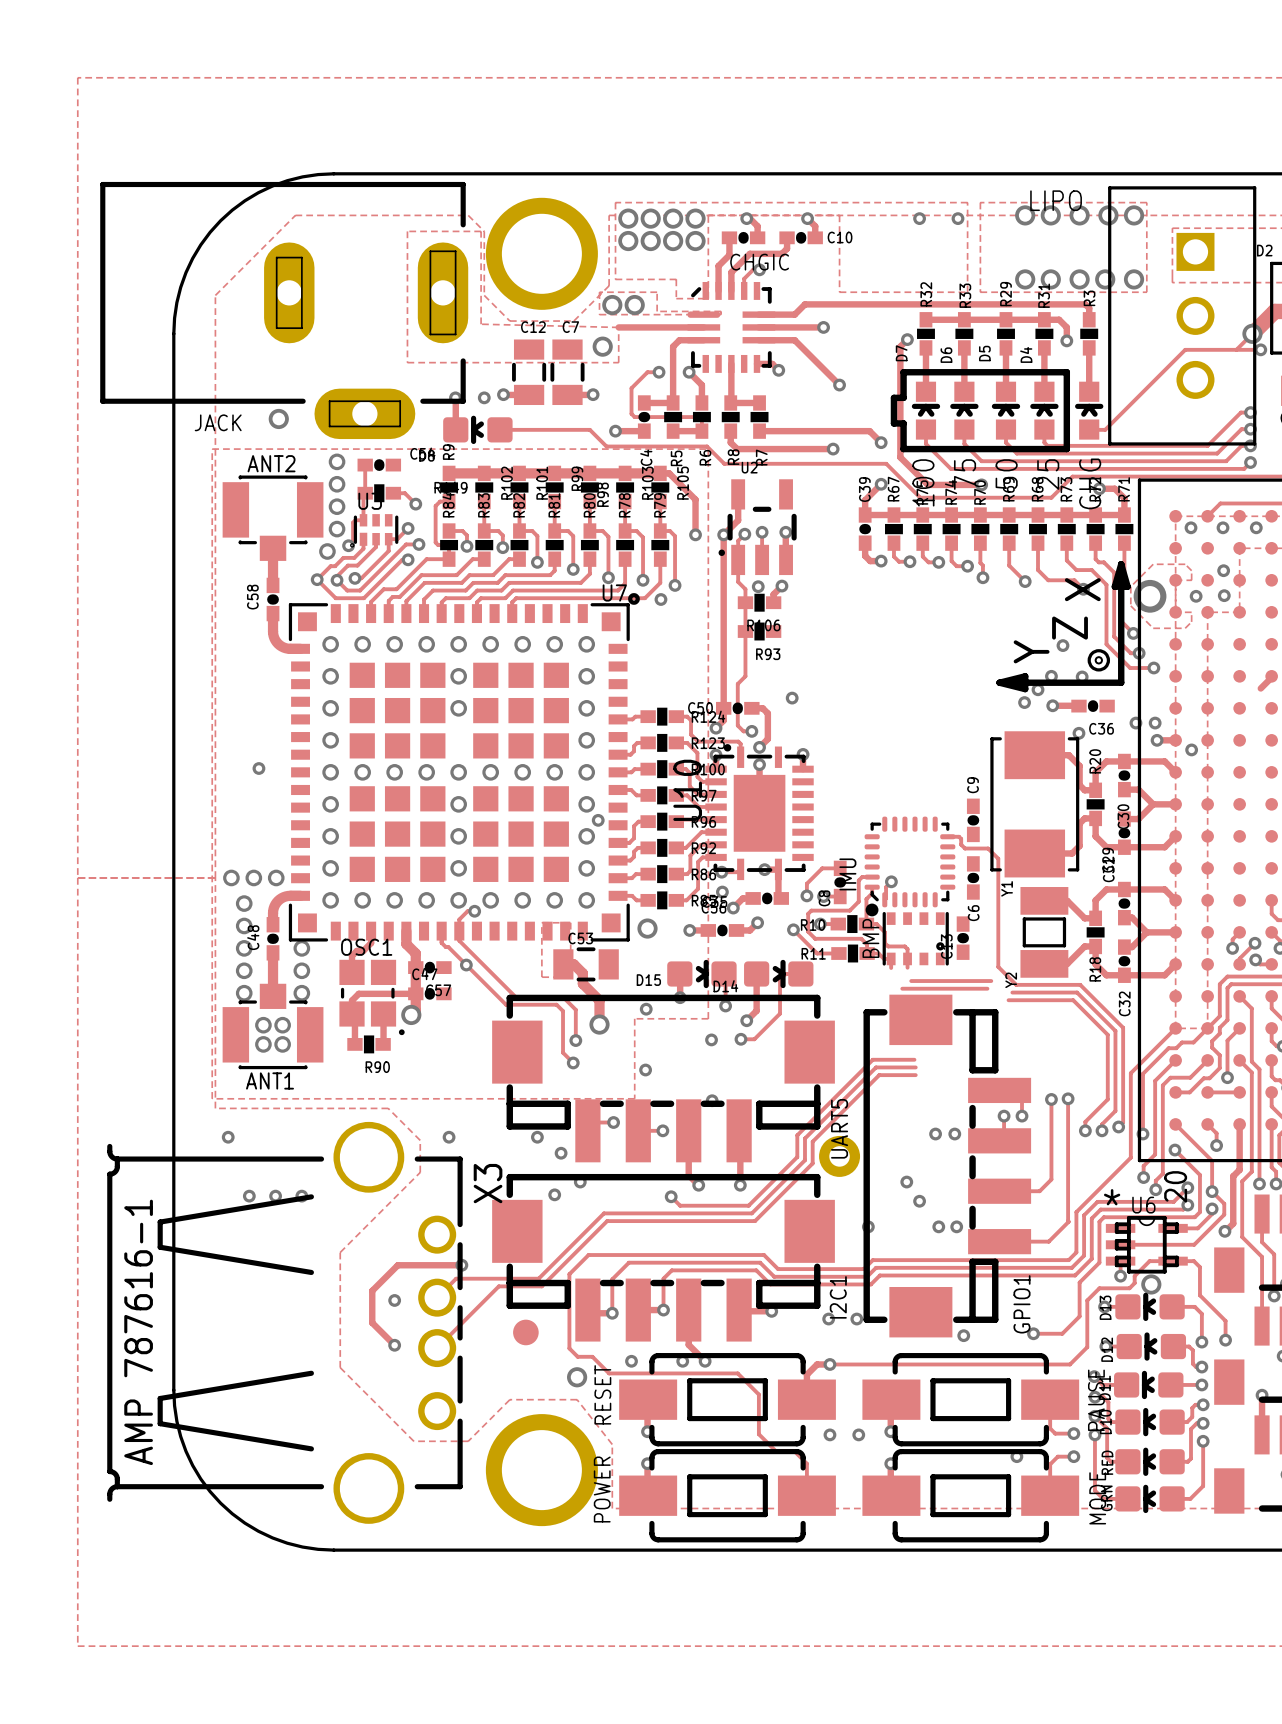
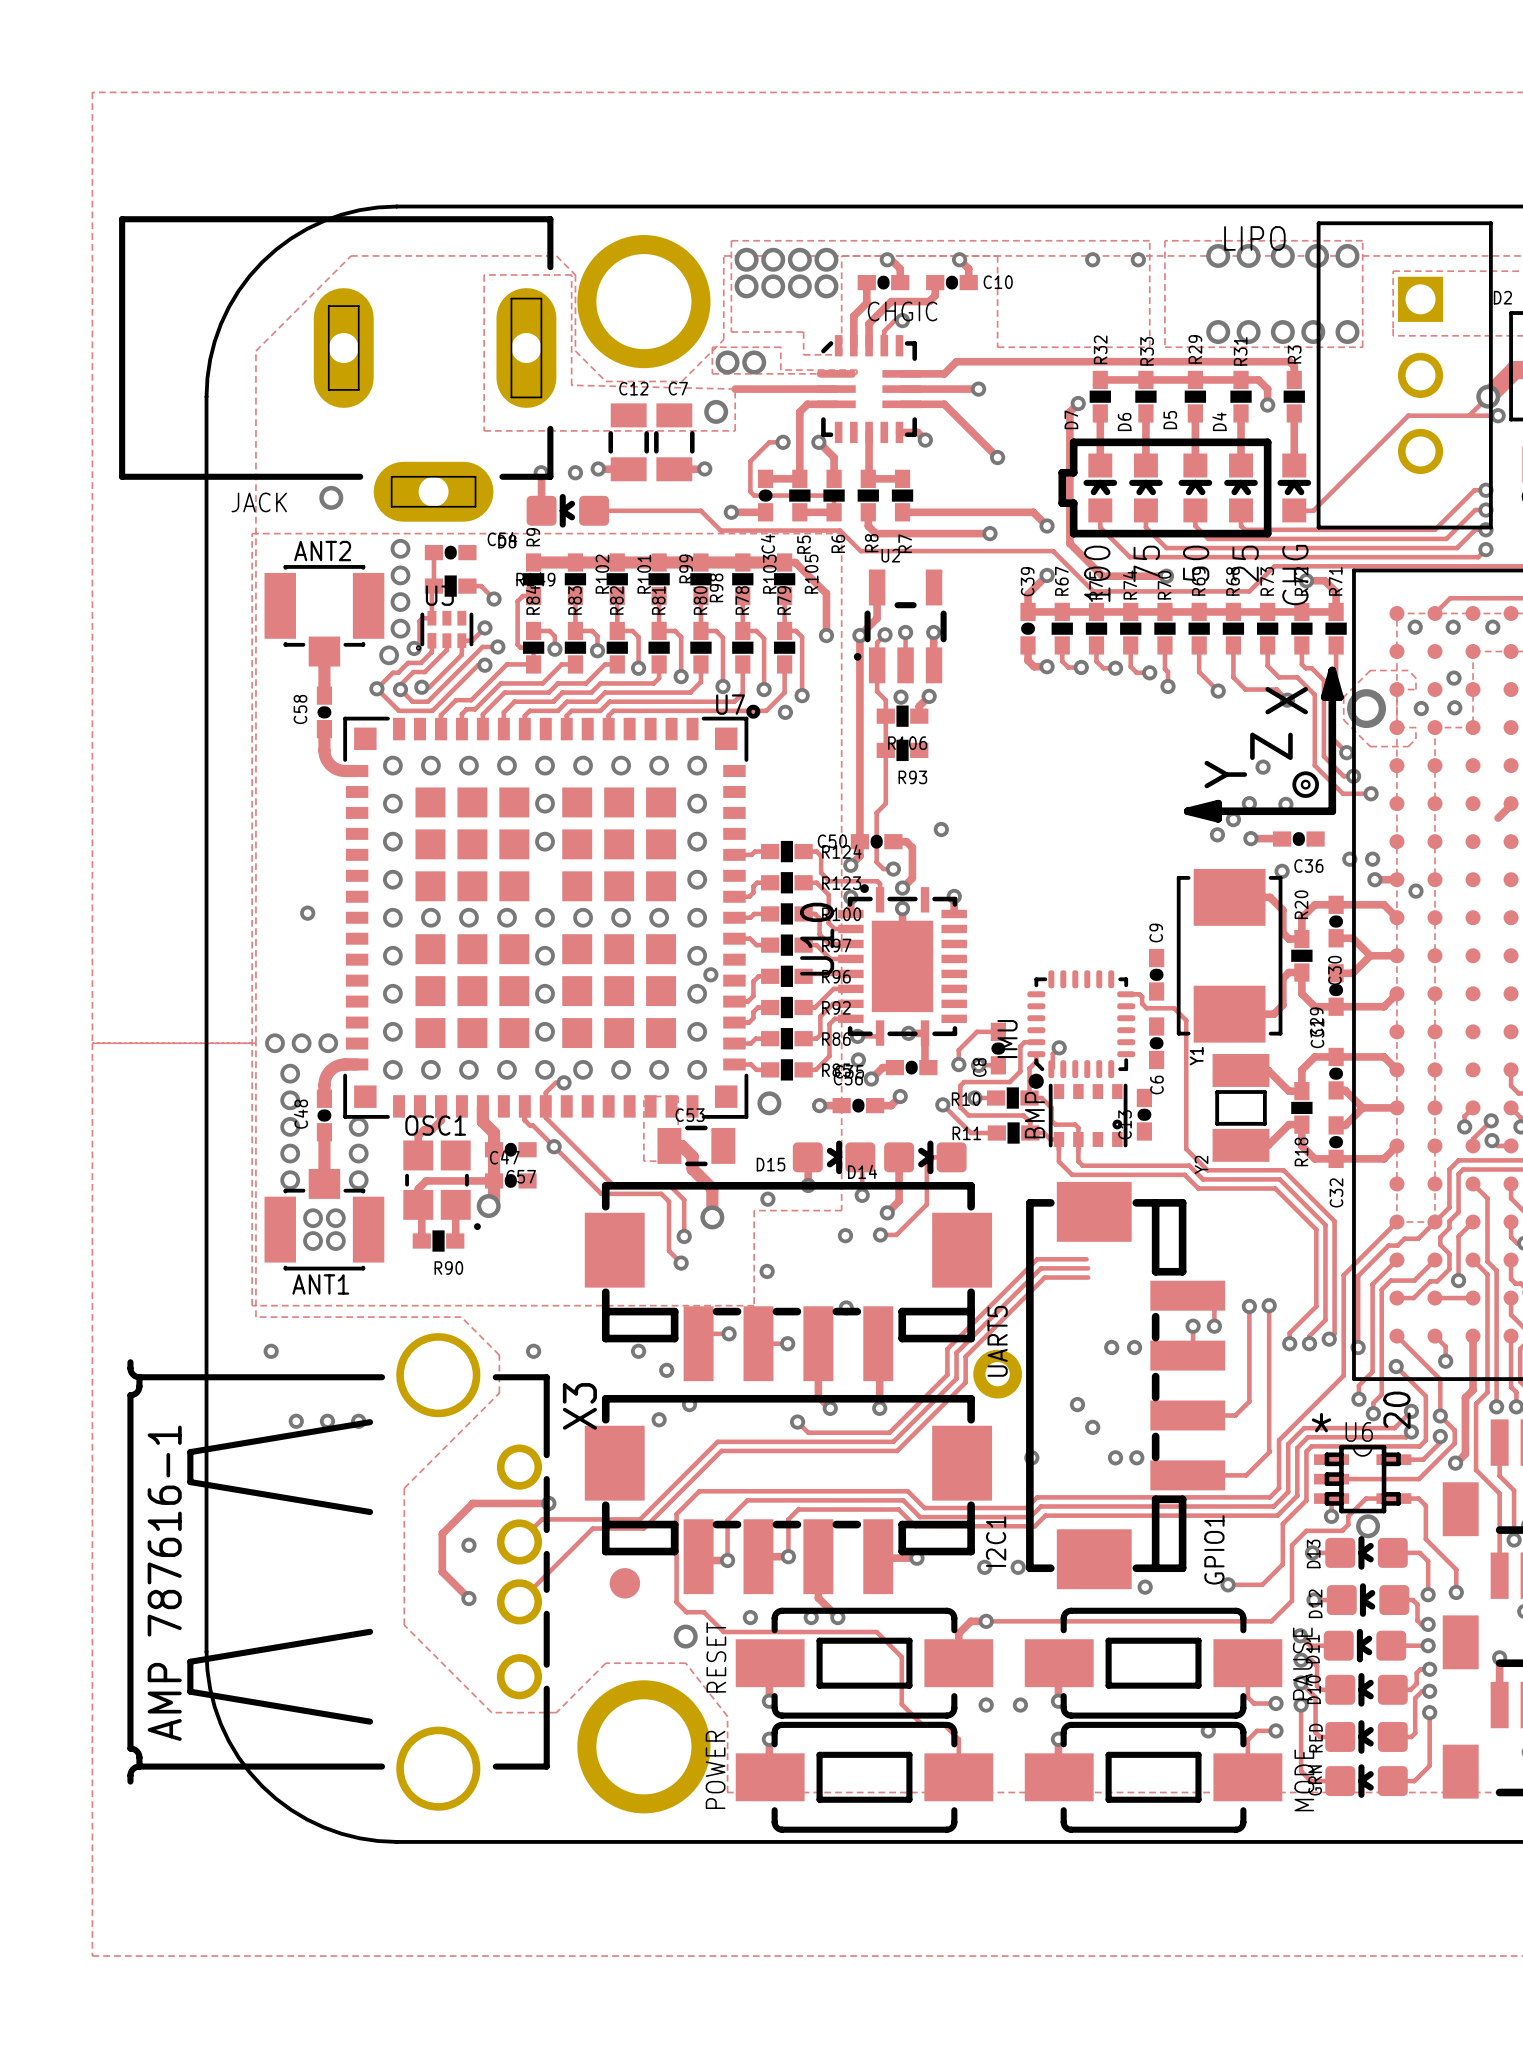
track: none -> (1058, 1150) (1058, 1161) (1072, 1174)
track: none -> (1078, 1149) (1078, 1161) (1082, 1165)
track: none -> (1177, 1165) (1189, 1165) (1202, 1179)
track: none -> (1173, 1174) (1184, 1174) (1198, 1188)

